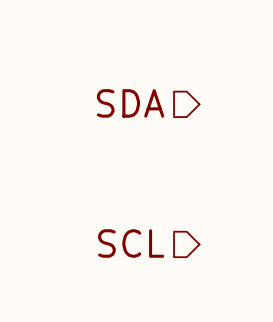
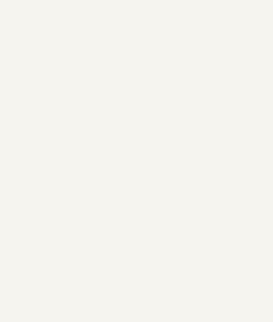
hierarchical label: SDA (130, 103) -> none
hierarchical label: SCL (131, 243) -> none

